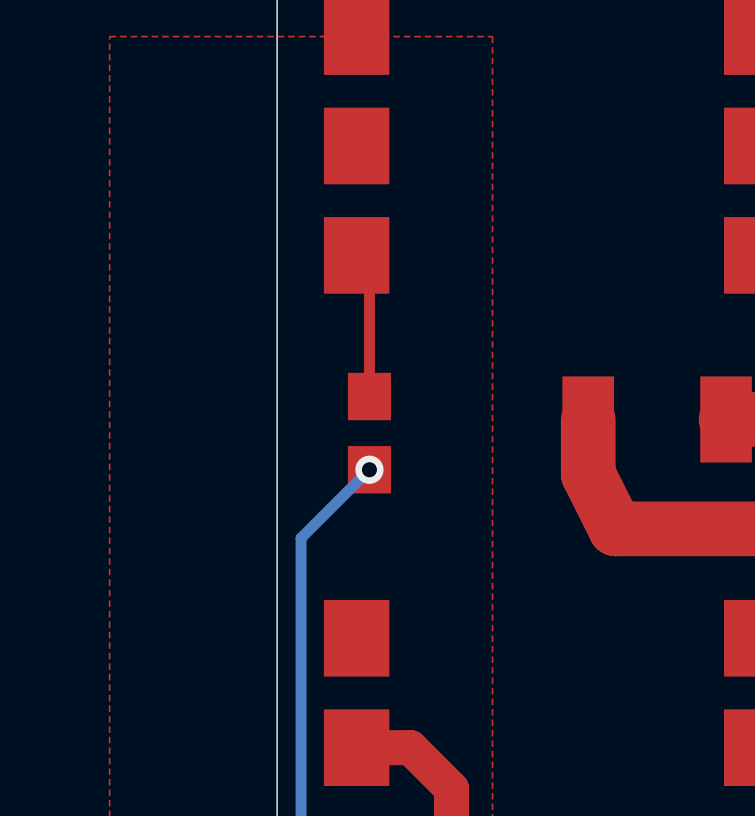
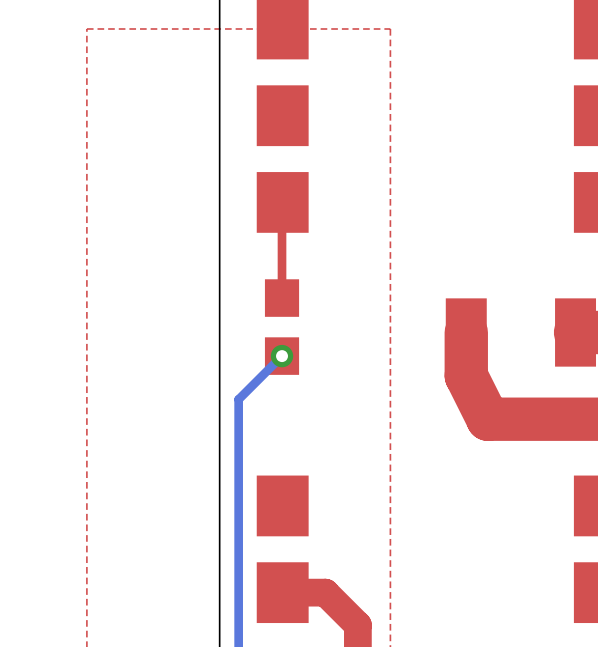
top track: none -> (282, 202) (282, 298)
top track: (369, 268) (369, 396) -> none
part position: (369, 433) -> (282, 327)
bottom track: (369, 469) (301, 538) -> (282, 356) (238, 399) (238, 426)
via position: (369, 469) -> (282, 356)

